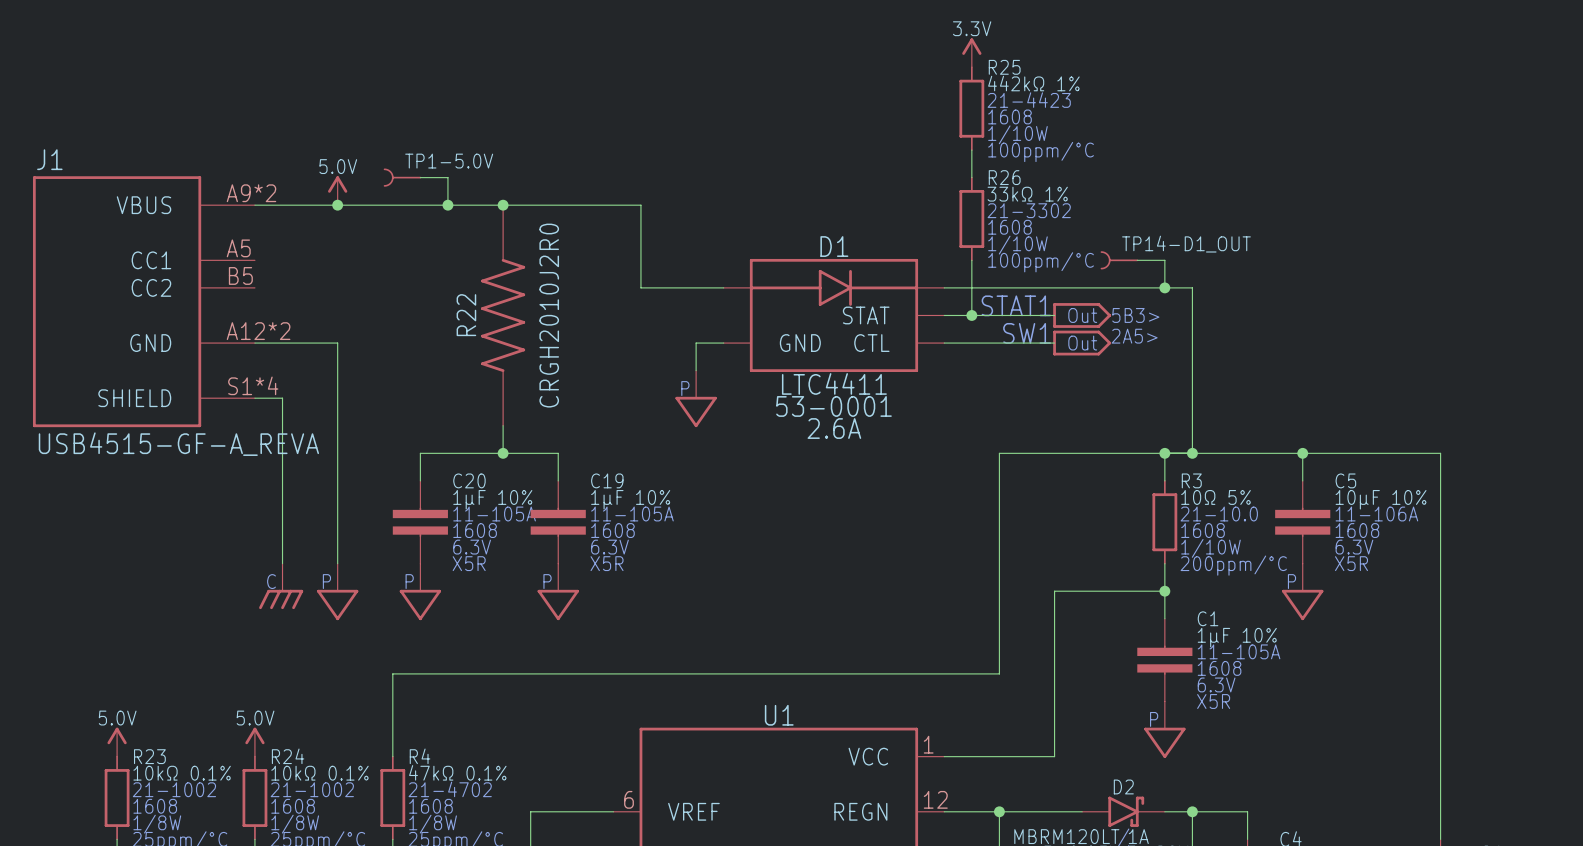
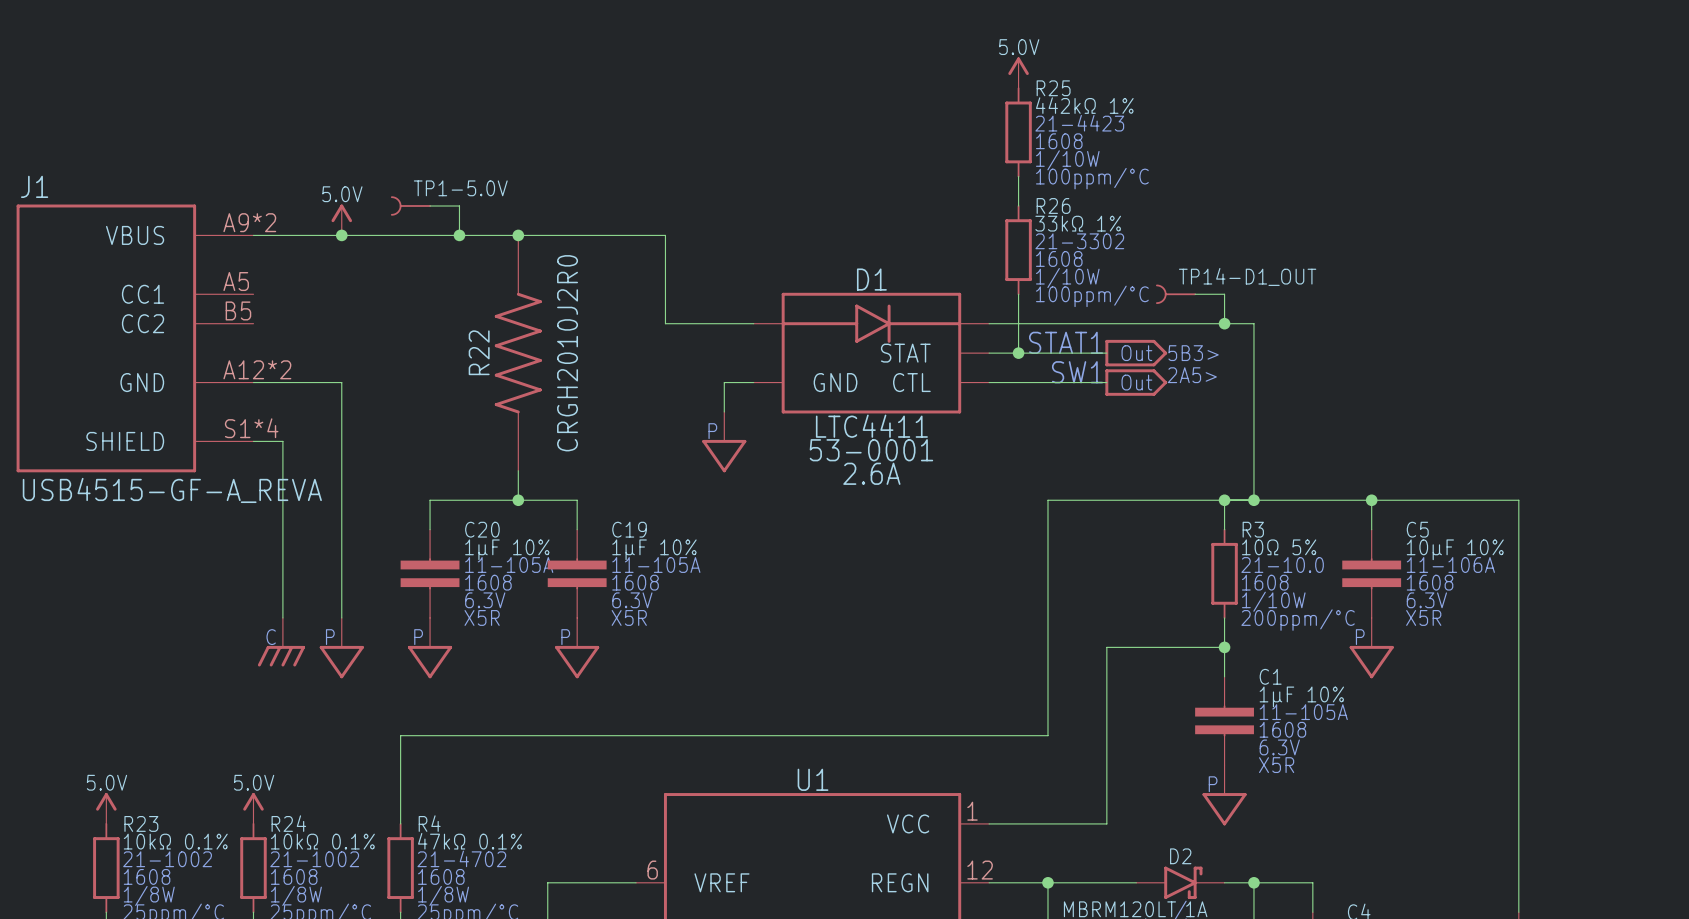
power symbol: 3.3V (971, 52) -> 5.0V (1018, 72)

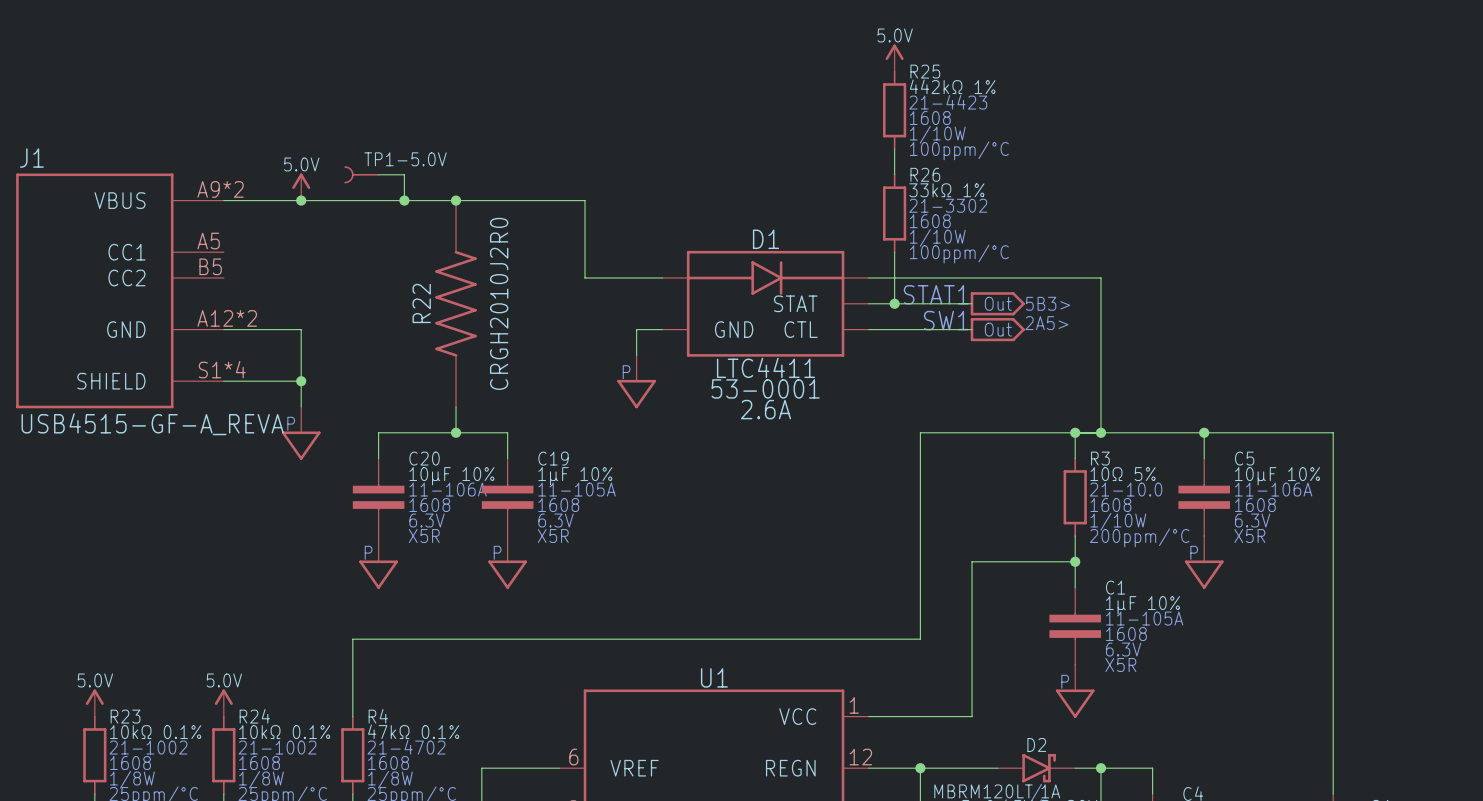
TP14-D1_OUT: (1176, 294) -> none
wire: (1195, 294) (1224, 294) (1224, 323) -> none
junction: (1224, 323) -> none
wire: (282, 441) (282, 617) -> (249, 381) (301, 381)
junction: none -> (301, 381)
wire: (341, 470) (341, 617) -> none
C20 value: 1µF 10% (507, 549) -> 10µF 10% (451, 476)
C20 text: 11-105A (509, 564) -> 11-106A (448, 489)
power symbol: (281, 642) -> none
power symbol position: (341, 648) -> (301, 433)

